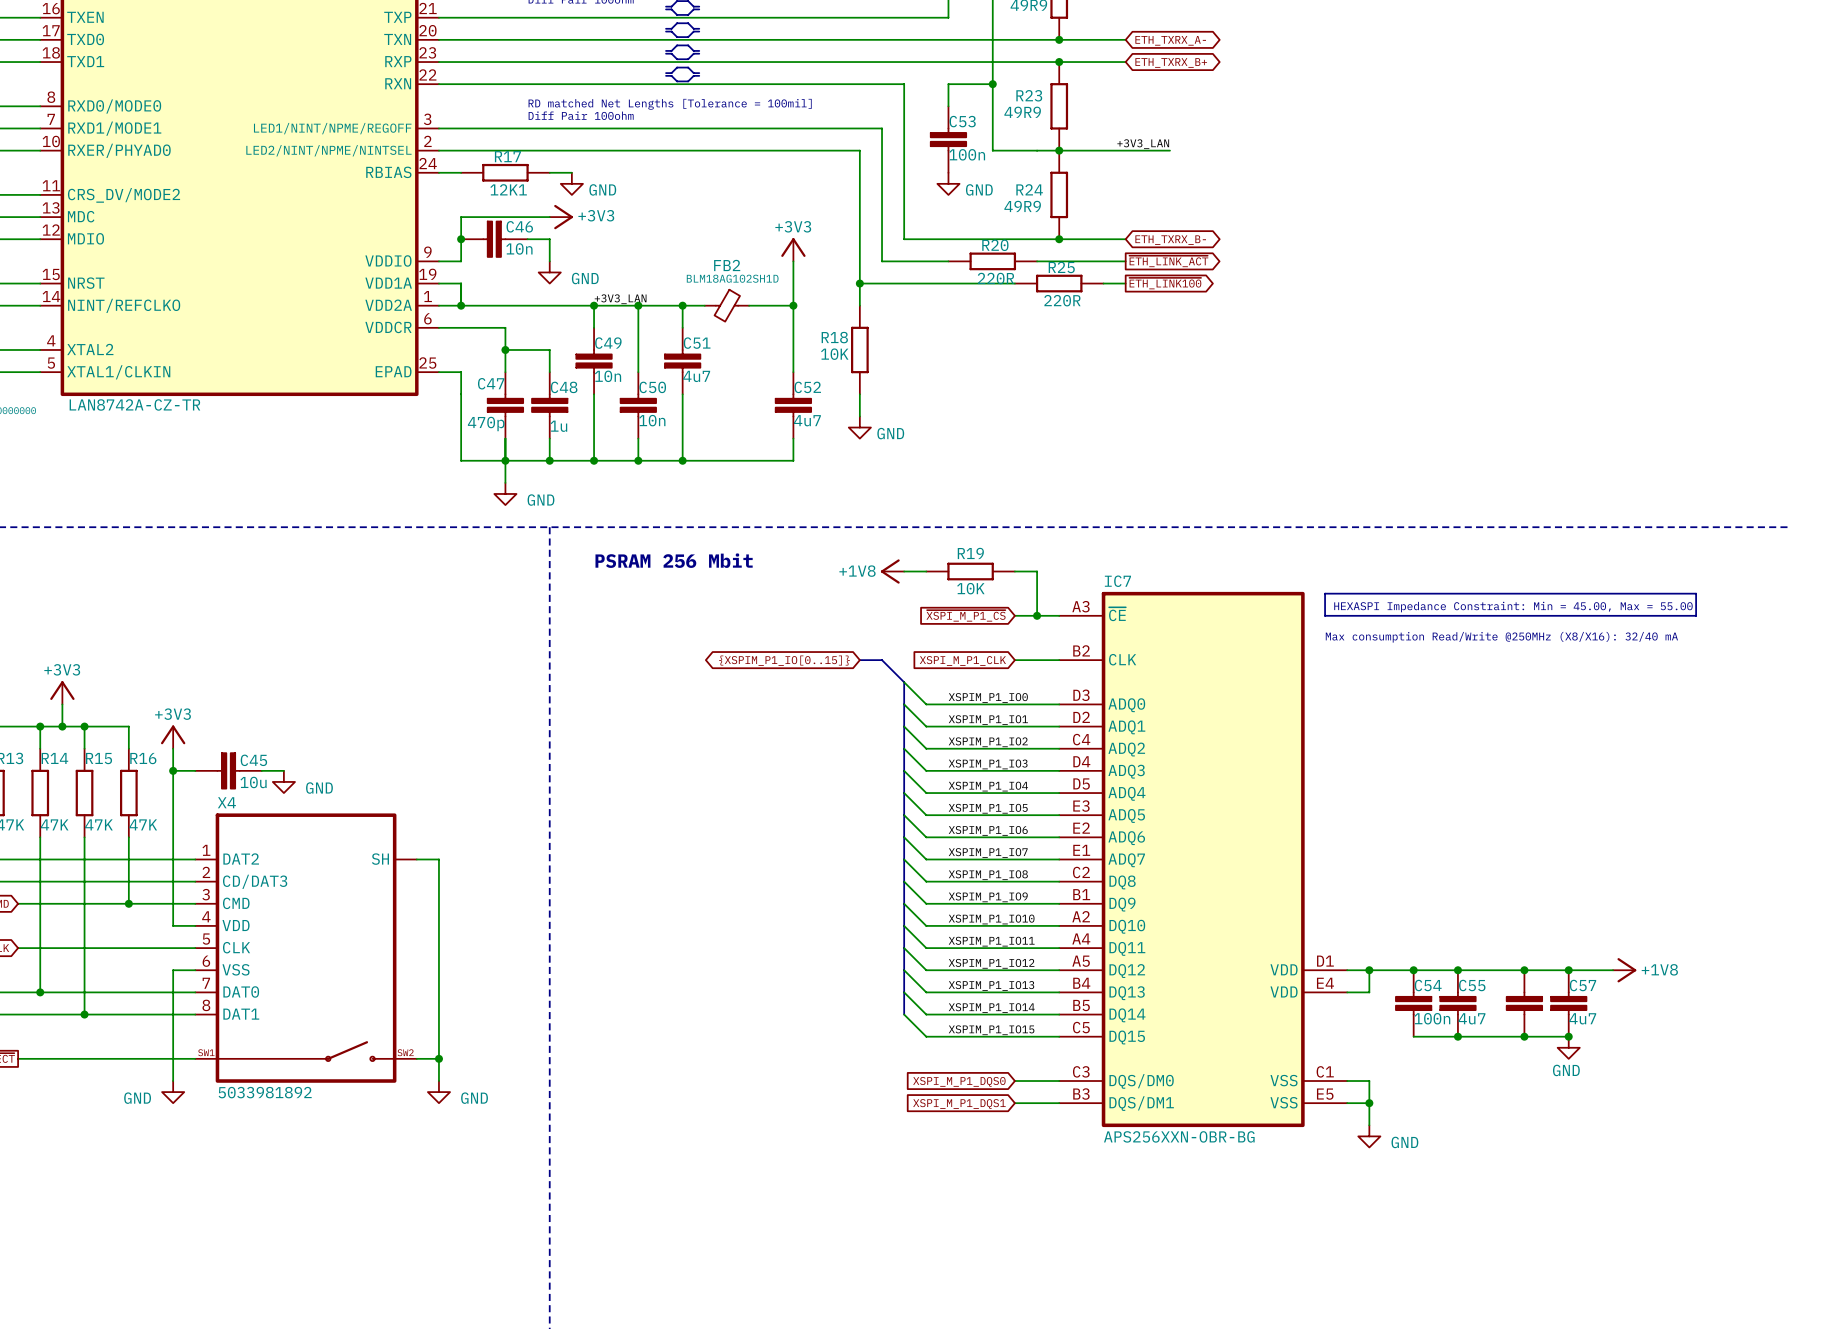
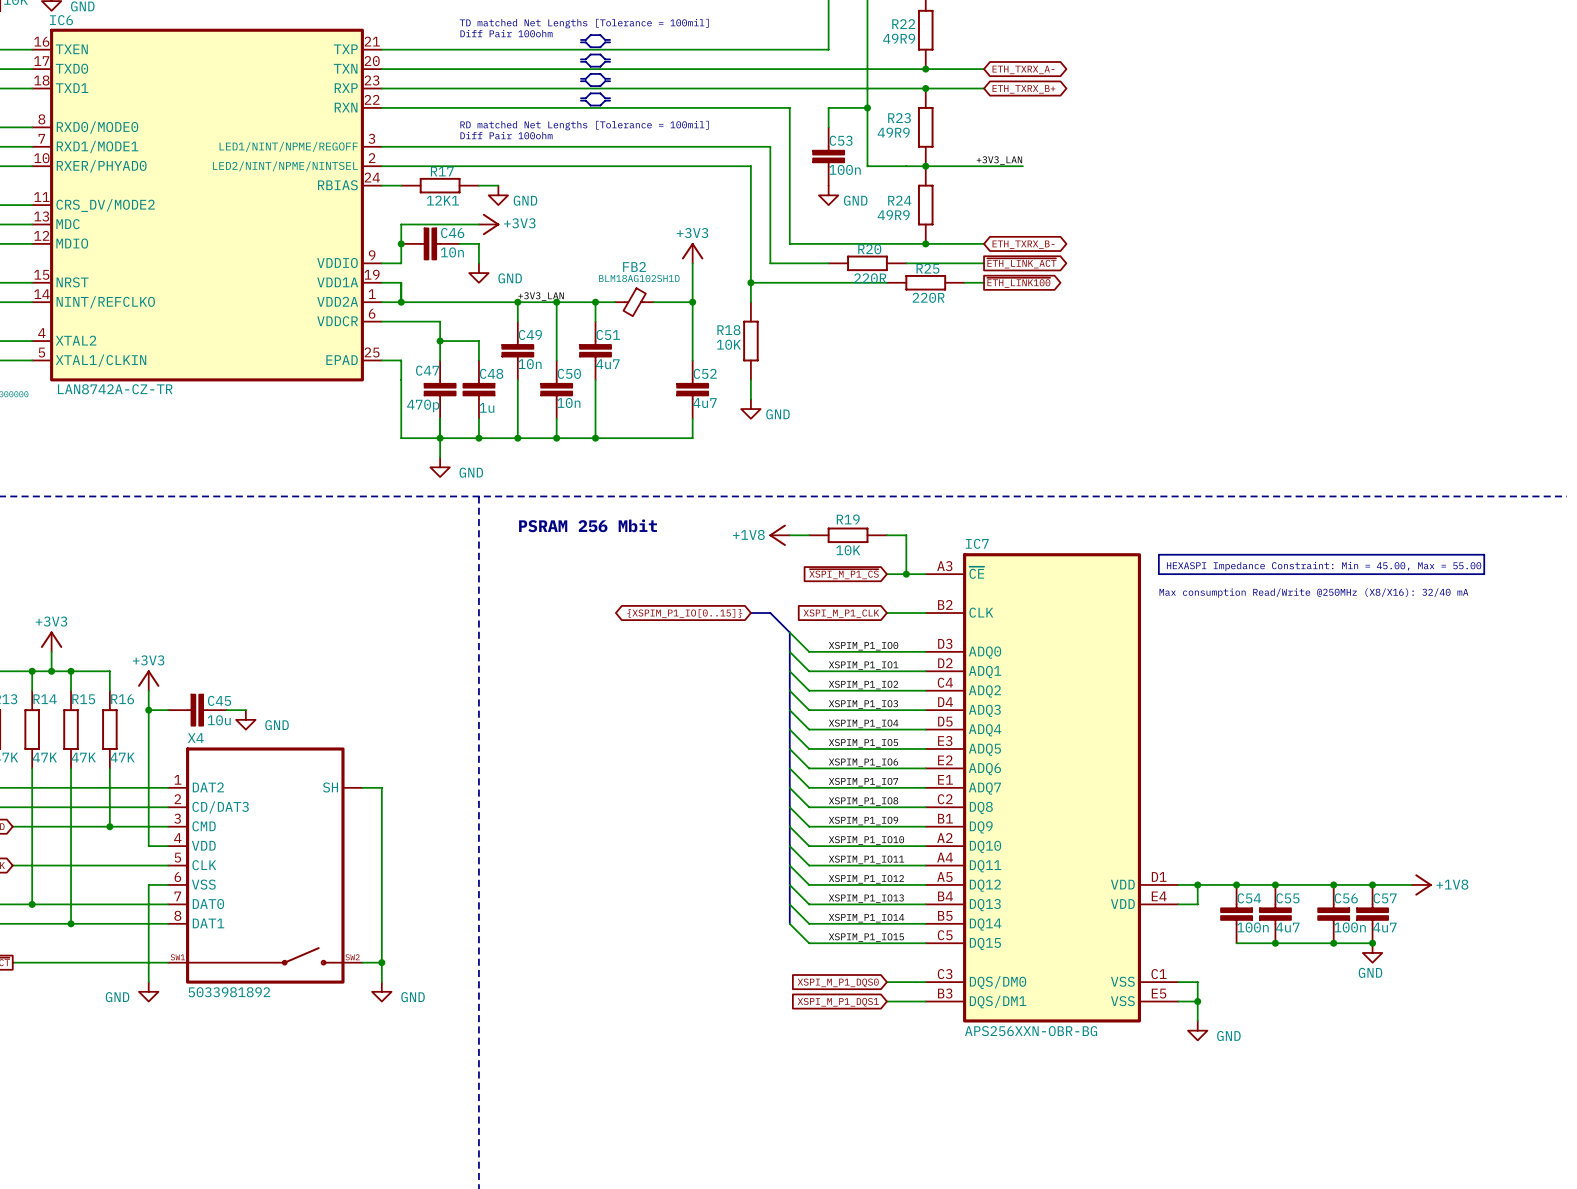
C56 name: none -> C56 (1346, 898)
C56 value: none -> 100n (1350, 927)

